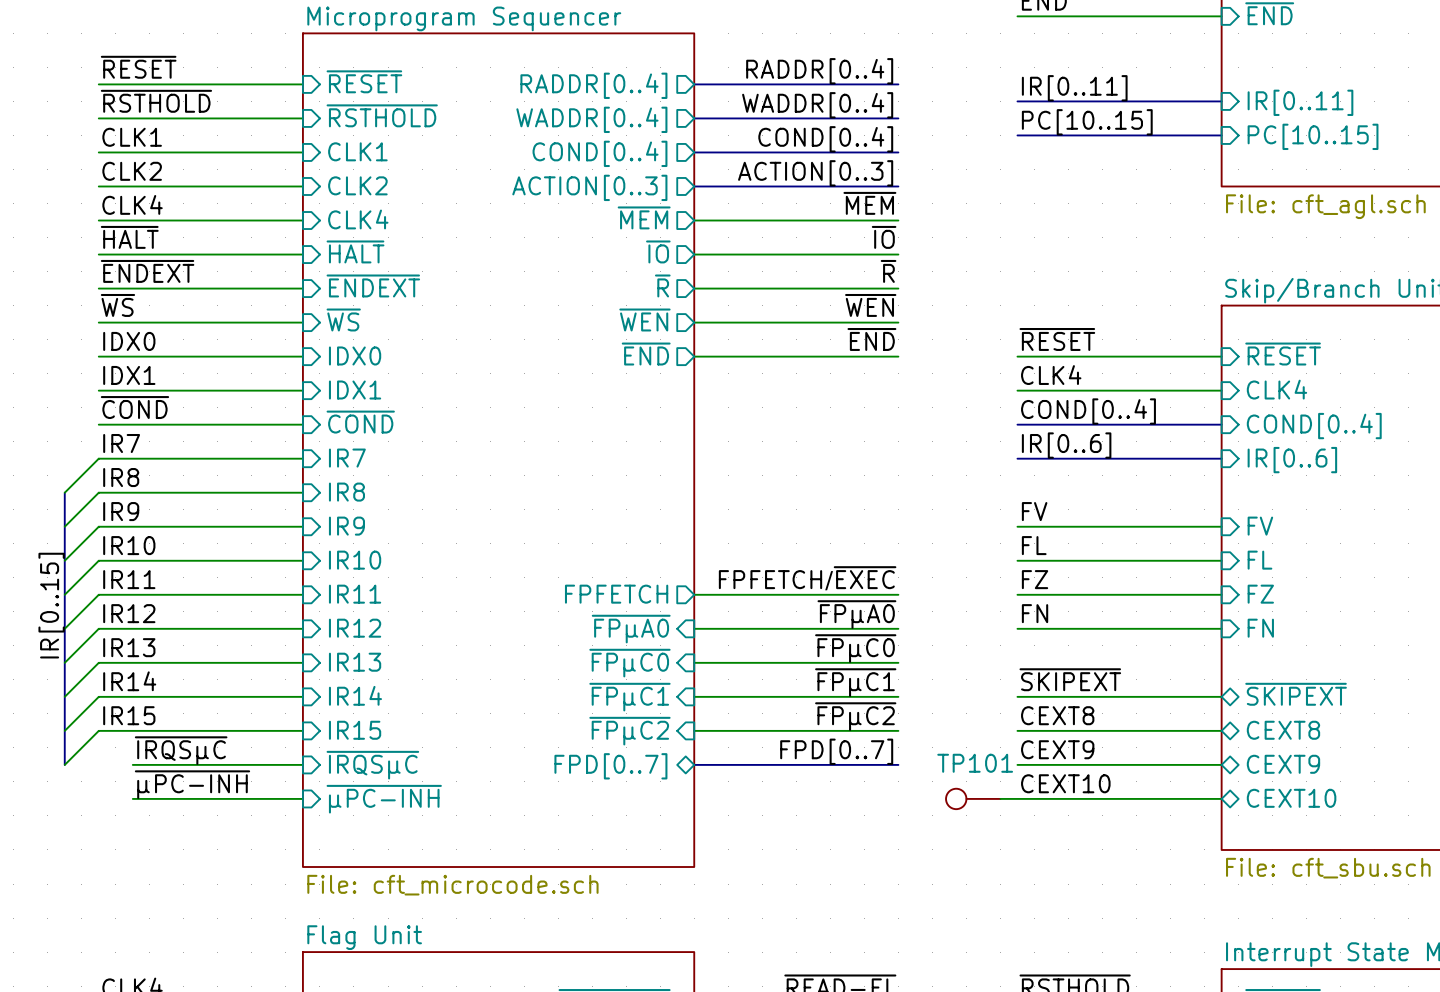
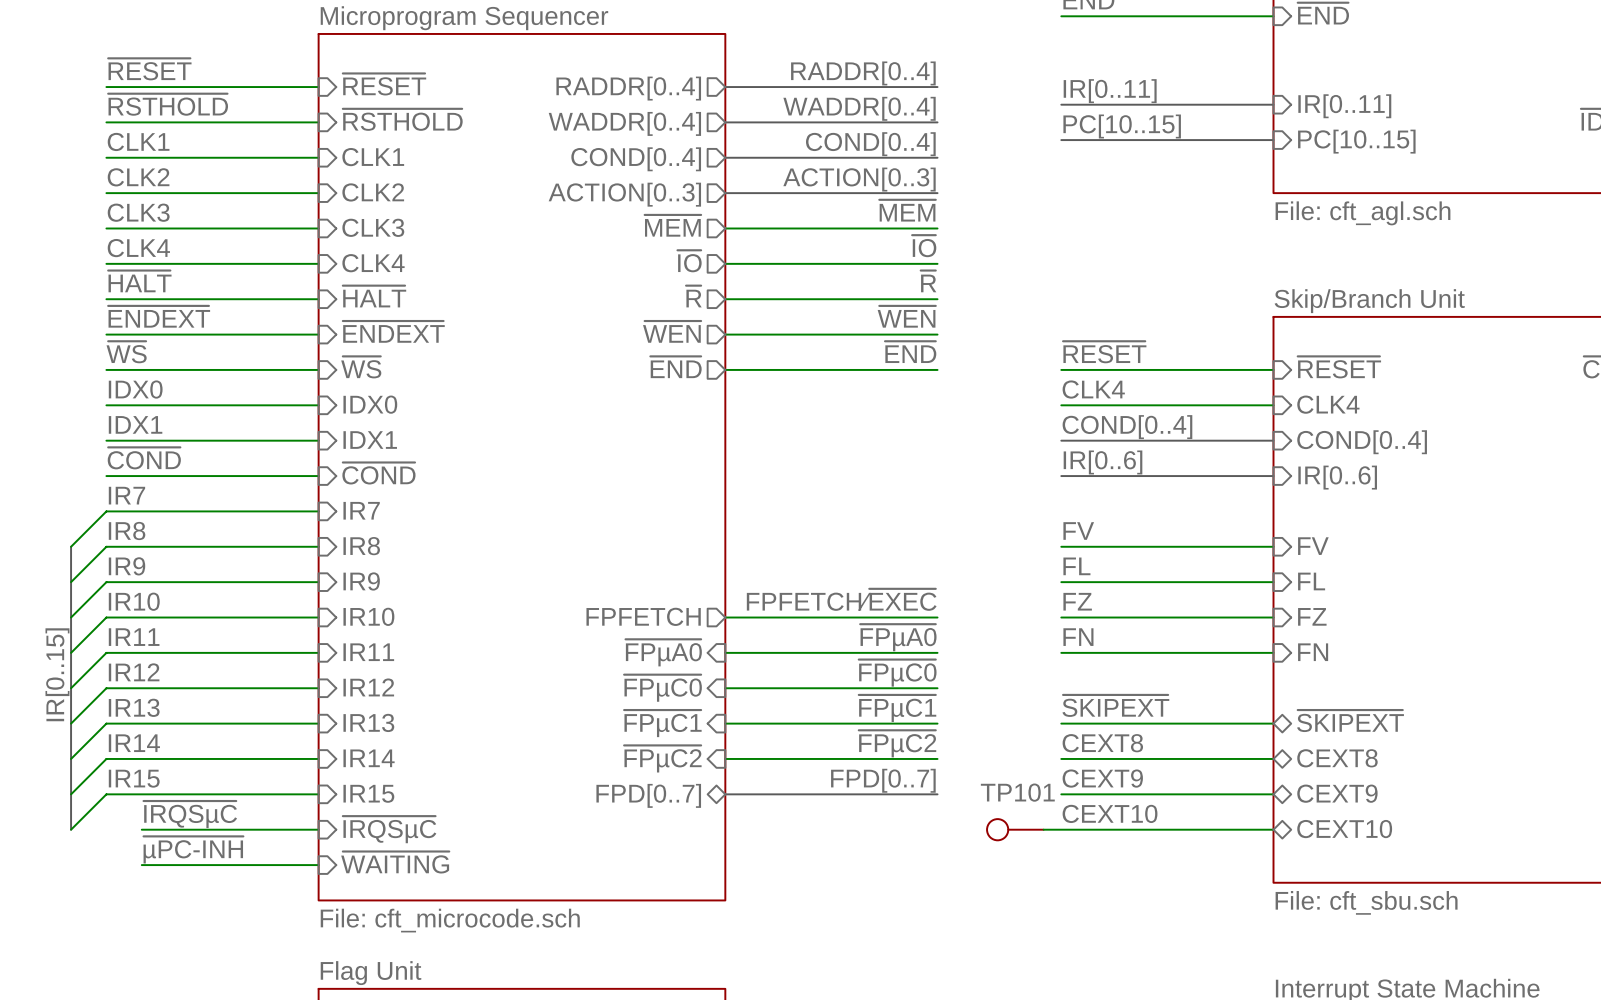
label: CLK4 (132, 204) -> CLK3 (138, 212)
sheet pin: CLK4 (358, 219) -> CLK3 (373, 227)
label: ~{HALT} (129, 237) -> CLK4 (138, 248)
sheet pin: ~{HALT} (355, 251) -> CLK4 (373, 263)
label: ~{ENDEXT} (147, 271) -> ~{HALT} (139, 281)
sheet pin: ~{ENDEXT} (373, 285) -> ~{HALT} (374, 296)
label: ~{WS} (117, 305) -> ~{ENDEXT} (159, 316)
sheet pin: ~{WS} (343, 320) -> ~{ENDEXT} (393, 331)
label: IDX0 (129, 341) -> ~{WS} (126, 352)
sheet pin: IDX0 (355, 355) -> ~{WS} (361, 367)
label: IDX1 (129, 375) -> IDX0 (135, 389)
sheet pin: IDX1 (355, 390) -> IDX0 (370, 404)
label: ~{COND} (134, 407) -> IDX1 (135, 424)
sheet pin: ~{COND} (360, 422) -> IDX1 (370, 440)
label: IR7 (121, 443) -> ~{COND} (144, 458)
wire: (98, 458) (64, 492) -> none
sheet pin: IR7 (347, 458) -> ~{COND} (378, 473)
label: IR8 (121, 477) -> IR7 (126, 495)
bus: (64, 492) (64, 526) -> (71, 794) (71, 829)
sheet pin: IR8 (346, 492) -> IR7 (361, 510)
label: IR9 (121, 511) -> IR8 (127, 531)
sheet pin: IR9 (346, 526) -> IR8 (361, 546)
label: IR10 (129, 545) -> IR9 (127, 566)
sheet pin: IR10 (355, 560) -> IR9 (361, 581)
label: IR11 (129, 579) -> IR10 (134, 601)
sheet pin: IR11 (355, 594) -> IR10 (368, 616)
label position: IR[0..15] (51, 605) -> IR[0..15] (57, 674)
label: IR12 (129, 613) -> IR11 (134, 637)
sheet pin: IR12 (355, 628) -> IR11 (368, 652)
label: IR13 (129, 647) -> IR12 (134, 672)
sheet pin: IR13 (355, 662) -> IR12 (368, 687)
label: IR14 (129, 681) -> IR13 (134, 707)
sheet pin: IR14 (355, 695) -> IR13 (368, 722)
label: IR15 (129, 715) -> IR14 (134, 743)
sheet pin: IR15 (355, 730) -> IR14 (369, 758)
label: none -> IR15 (134, 778)
label: ~{IRQSµC} (181, 750) -> none
wire: none -> (141, 794) (106, 794) (71, 829)
sheet pin: ~{IRQSµC} (372, 765) -> IR15 (368, 793)
label: ~{µPC-INH} (192, 784) -> ~{IRQSµC} (190, 814)
sheet pin: ~{µPC-INH} (384, 799) -> ~{IRQSµC} (389, 829)
label: none -> ~{µPC-INH} (193, 849)
sheet pin: none -> ~{WAITING} (395, 862)
wire: none -> (141, 865) (318, 865)

